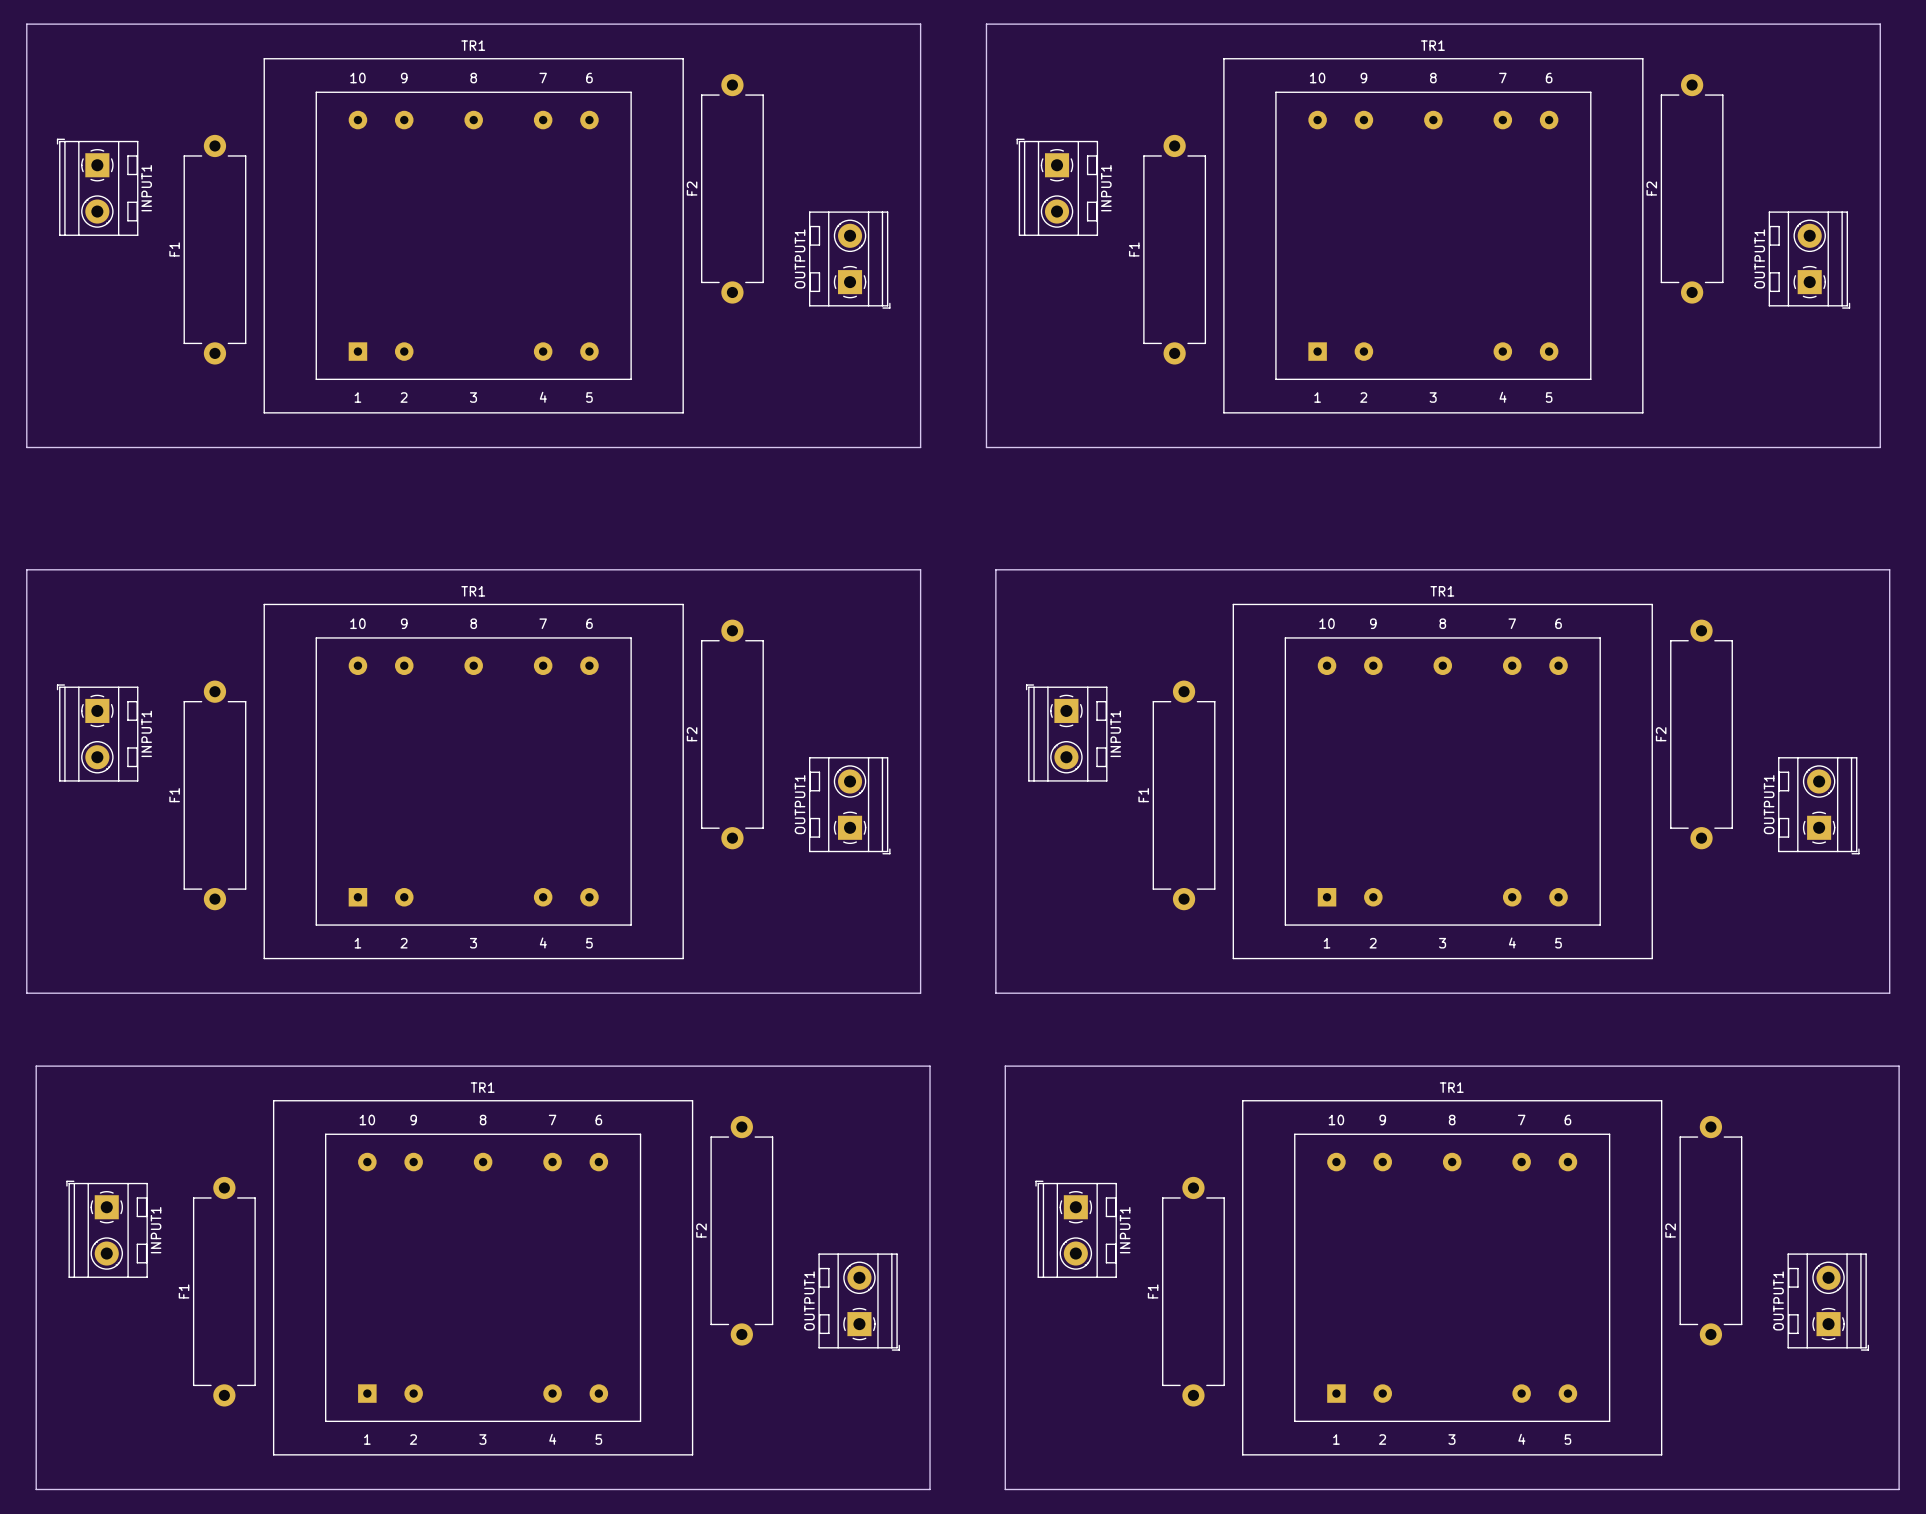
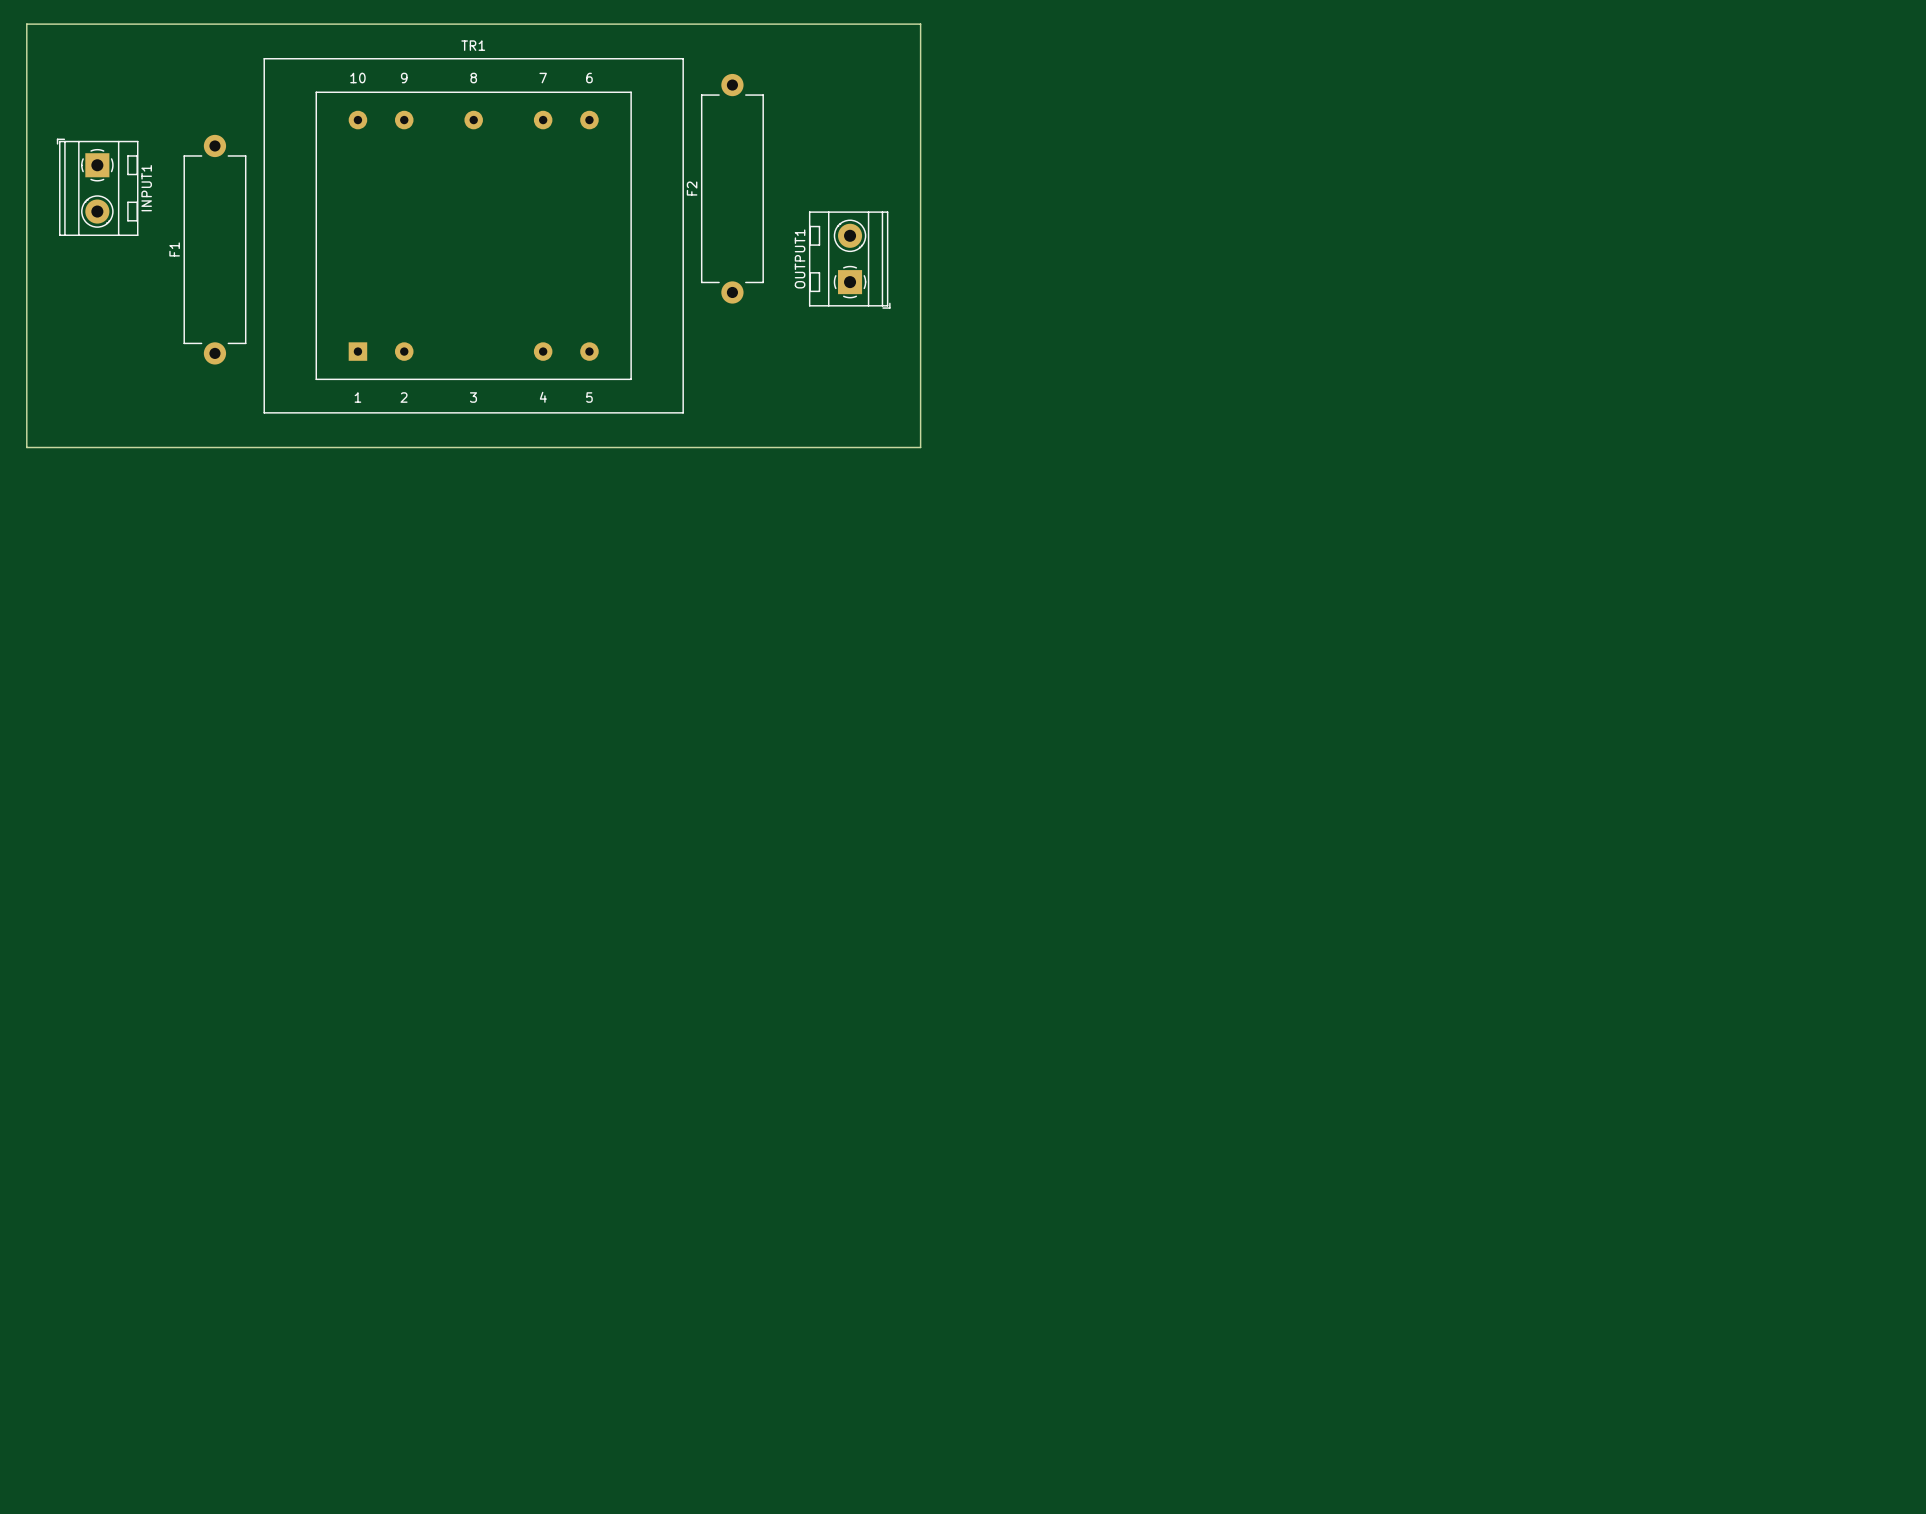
board edge: (986, 24) (1880, 24) (1880, 447) (986, 447) (986, 24) -> none
INPUT1: (1057, 187) -> none
F2: (1692, 188) -> none
TR1: (1433, 235) -> none
F1: (1174, 249) -> none
OUTPUT1: (1809, 260) -> none
board edge: (26, 569) (920, 569) (920, 993) (26, 993) (26, 569) -> none
board edge: (995, 569) (1889, 569) (1889, 993) (995, 993) (995, 569) -> none
INPUT1: (97, 732) -> none
INPUT1: (1066, 732) -> none
F2: (732, 734) -> none
F2: (1701, 734) -> none
TR1: (473, 781) -> none
TR1: (1442, 781) -> none
F1: (214, 795) -> none
F1: (1184, 795) -> none
OUTPUT1: (849, 805) -> none
OUTPUT1: (1818, 805) -> none
board edge: (36, 1066) (930, 1066) (930, 1489) (36, 1489) (36, 1066) -> none
board edge: (1005, 1066) (1899, 1066) (1899, 1489) (1005, 1489) (1005, 1066) -> none
INPUT1: (107, 1229) -> none
INPUT1: (1076, 1229) -> none
F2: (741, 1230) -> none
F2: (1710, 1230) -> none
TR1: (483, 1277) -> none
TR1: (1452, 1277) -> none
F1: (224, 1291) -> none
F1: (1193, 1291) -> none
OUTPUT1: (859, 1302) -> none
OUTPUT1: (1828, 1302) -> none

